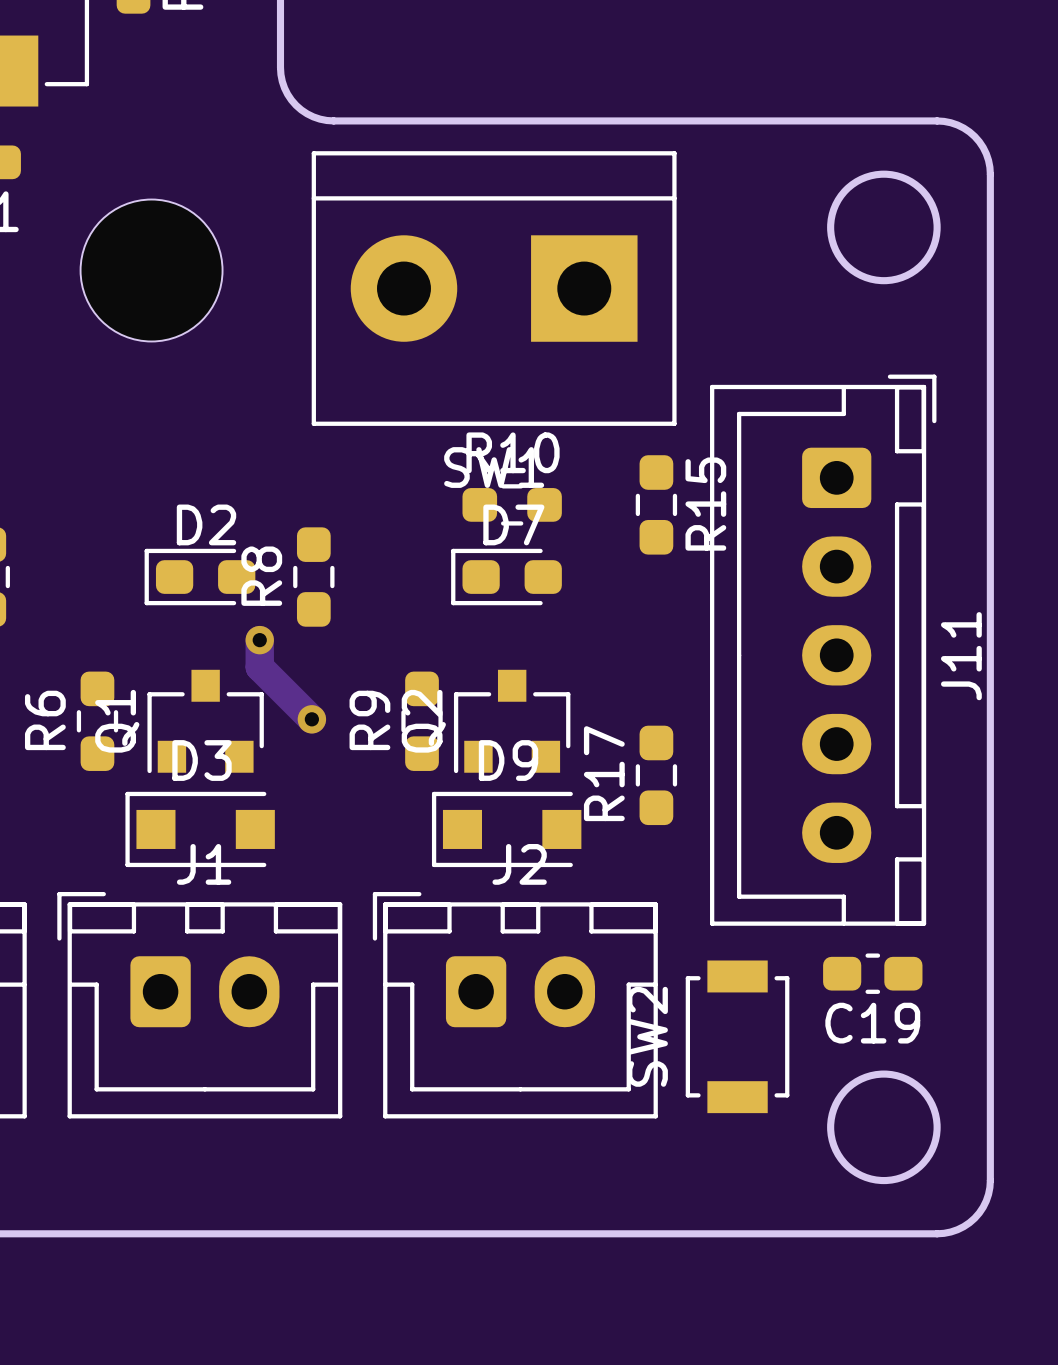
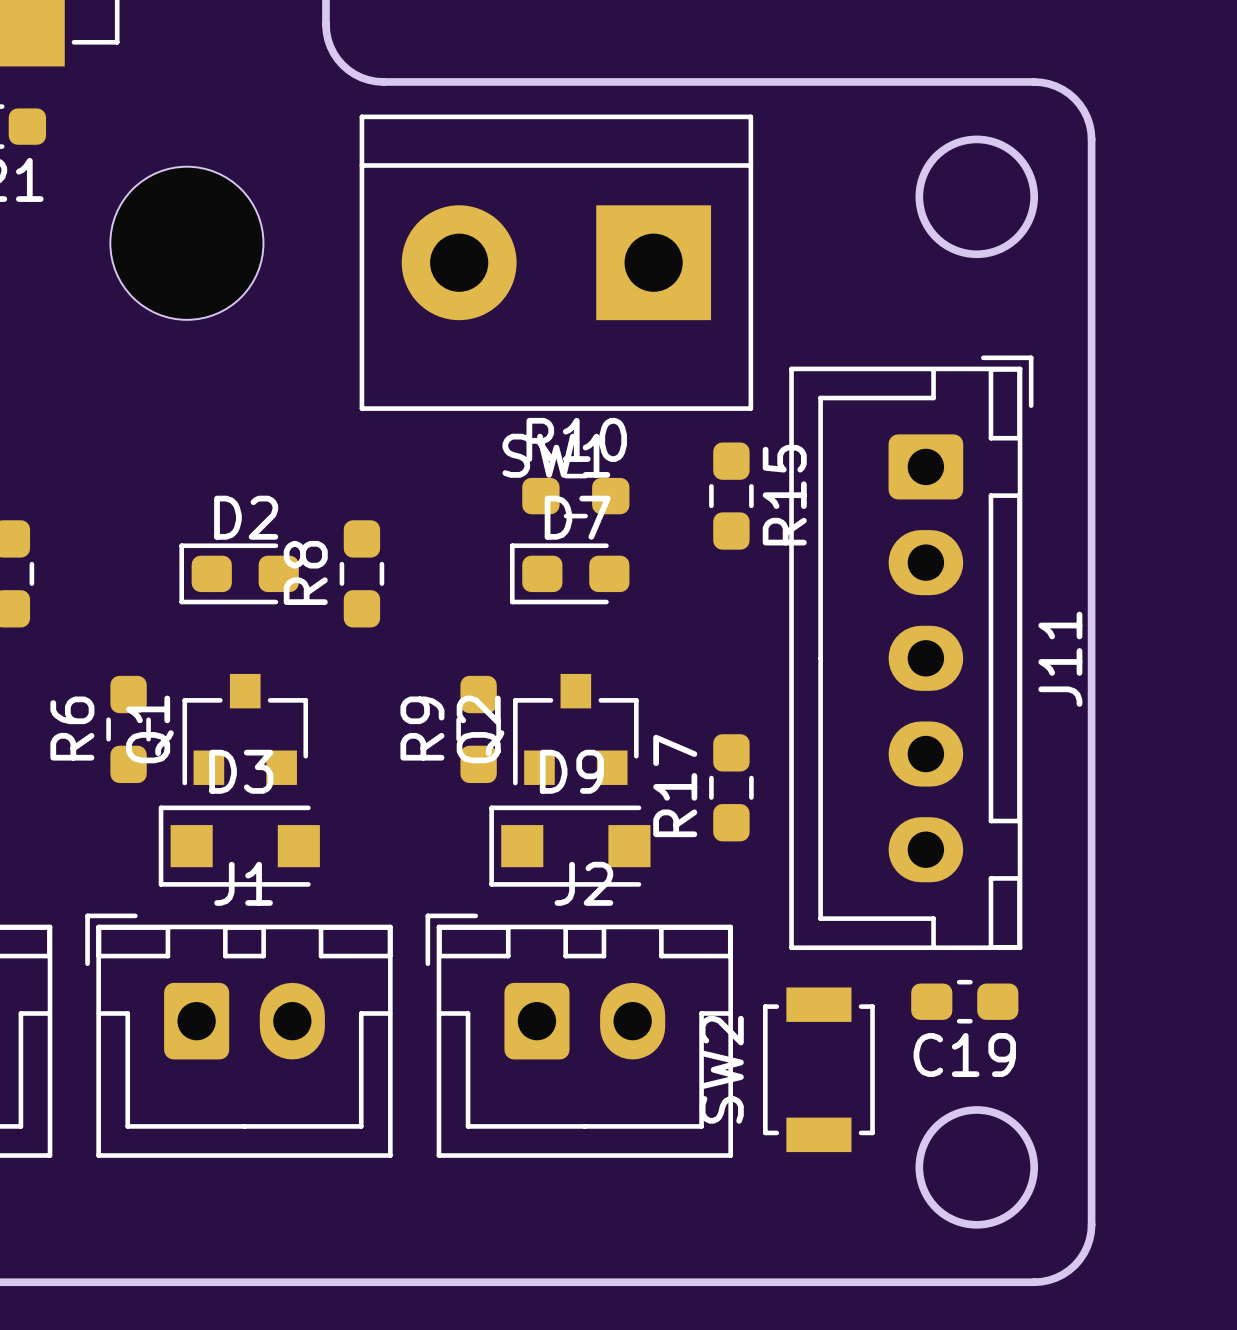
track: (259, 640) (259, 667) (311, 719) -> none
via: (259, 640) -> none
via: (311, 719) -> none

